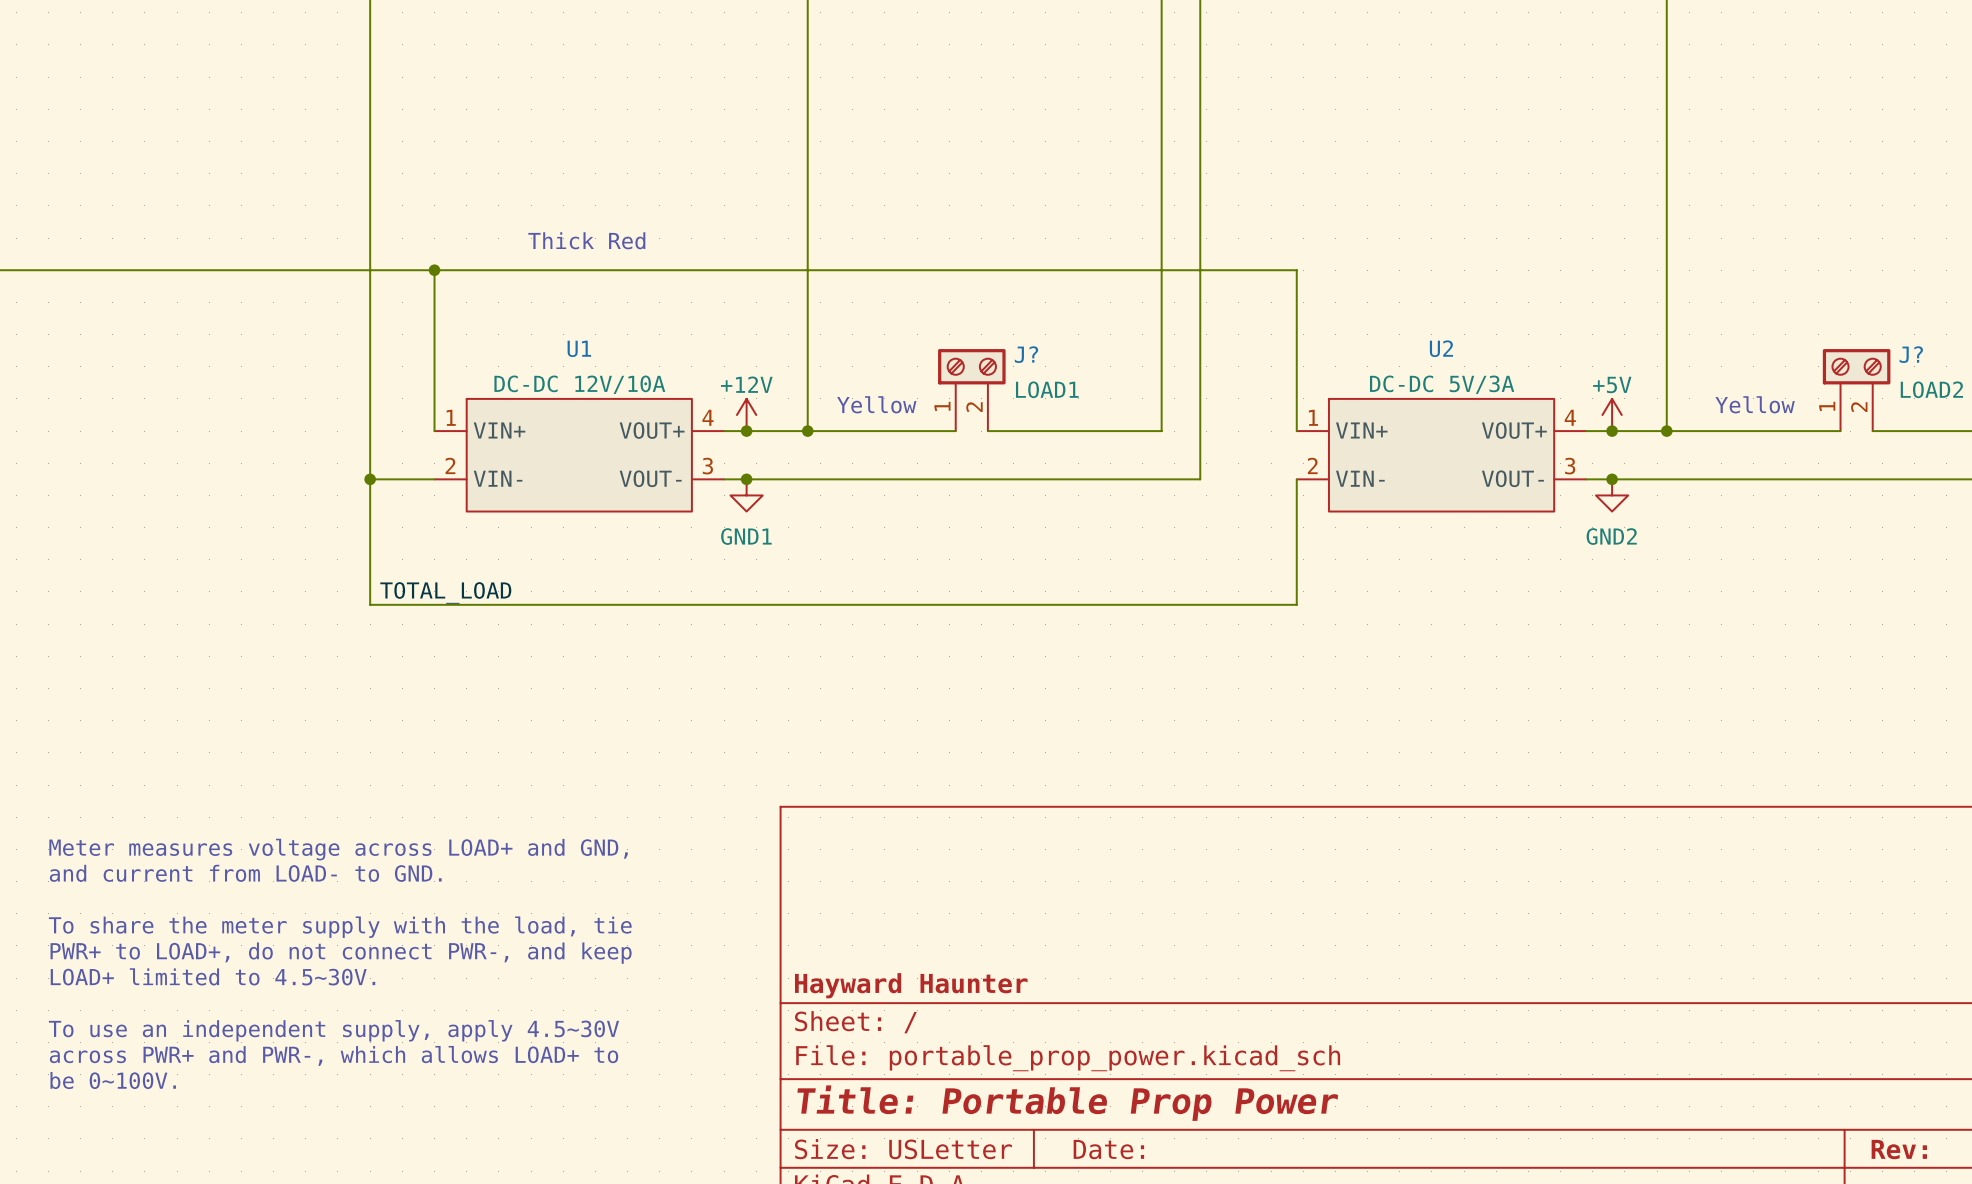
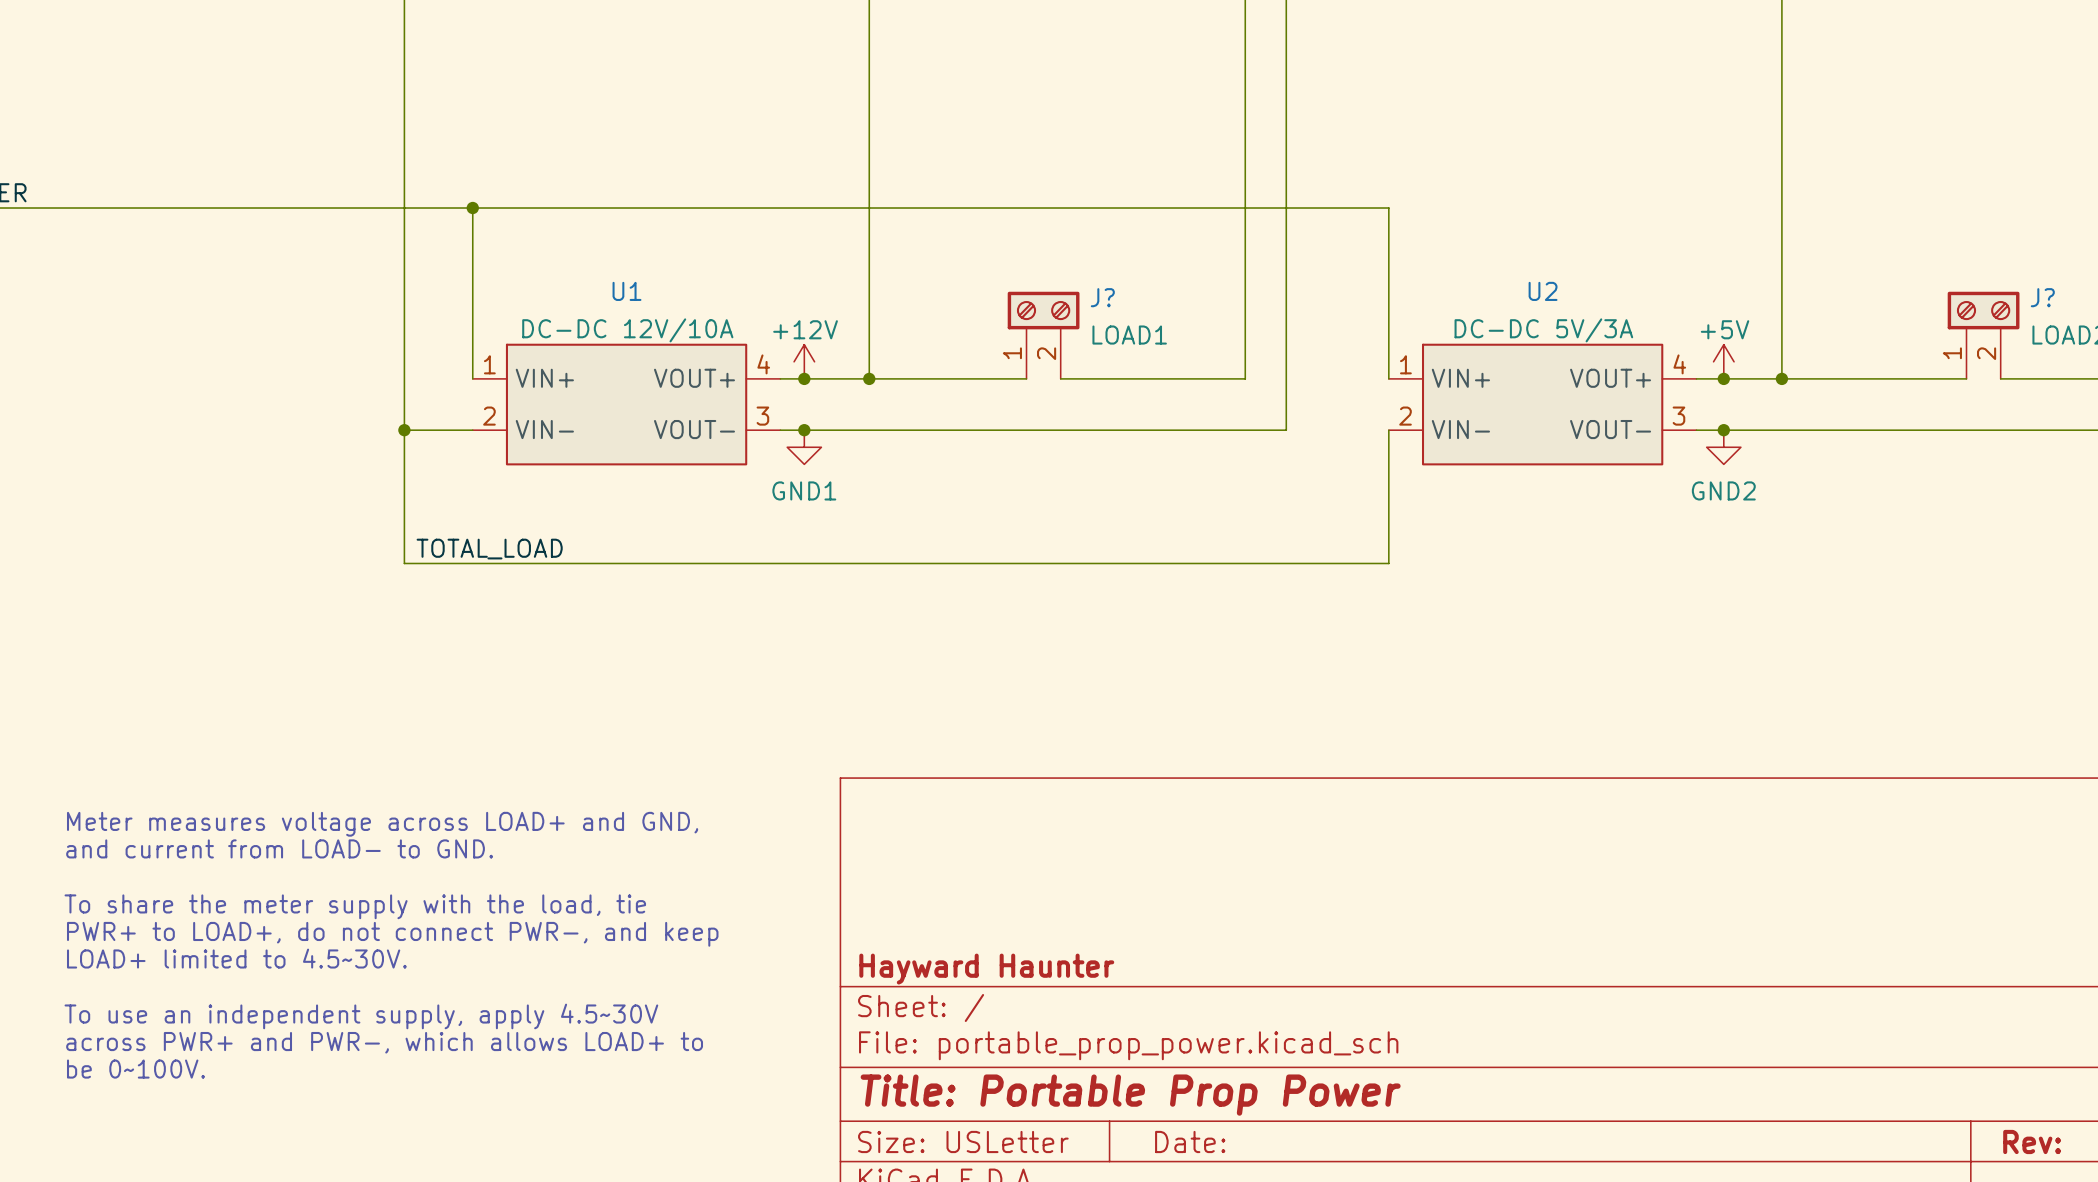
text: Thick Red (586, 240) -> none
text: Yellow (876, 404) -> none
text: Yellow (1755, 404) -> none

